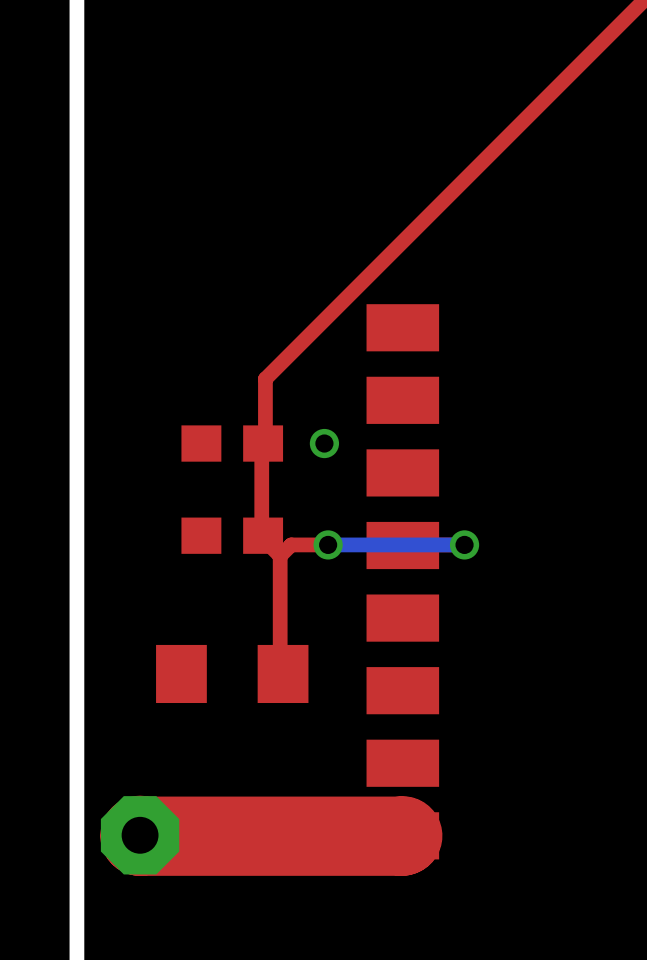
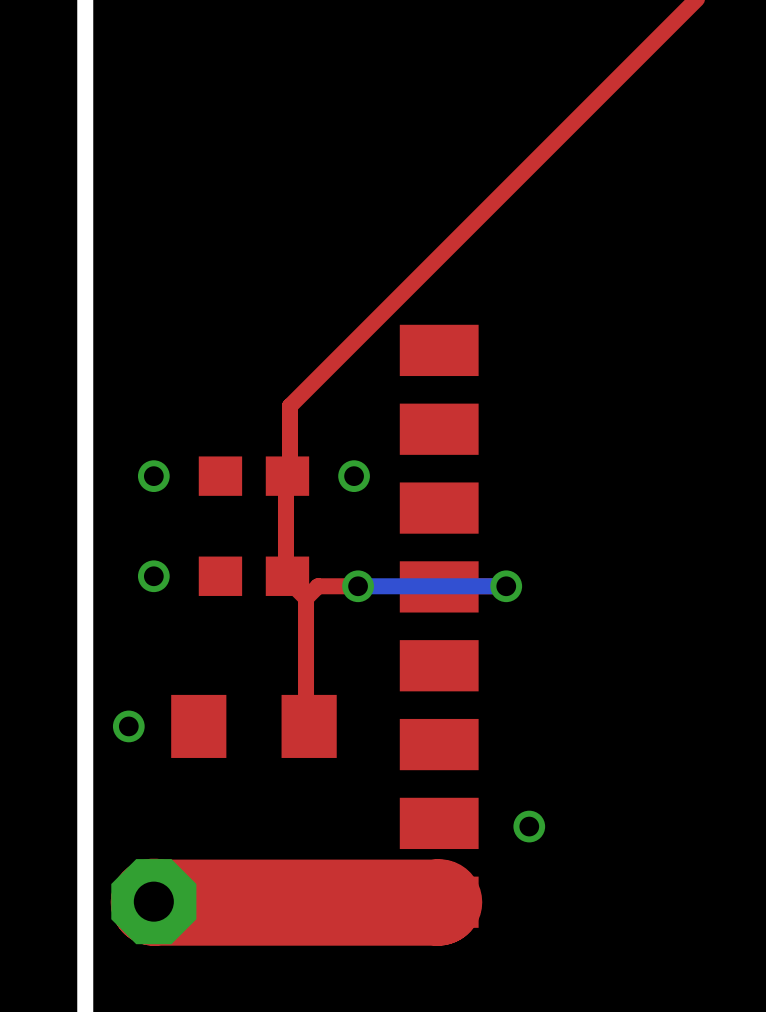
via: none -> (153, 476)
via: none -> (153, 576)
via: none -> (128, 726)
via: none -> (529, 826)

